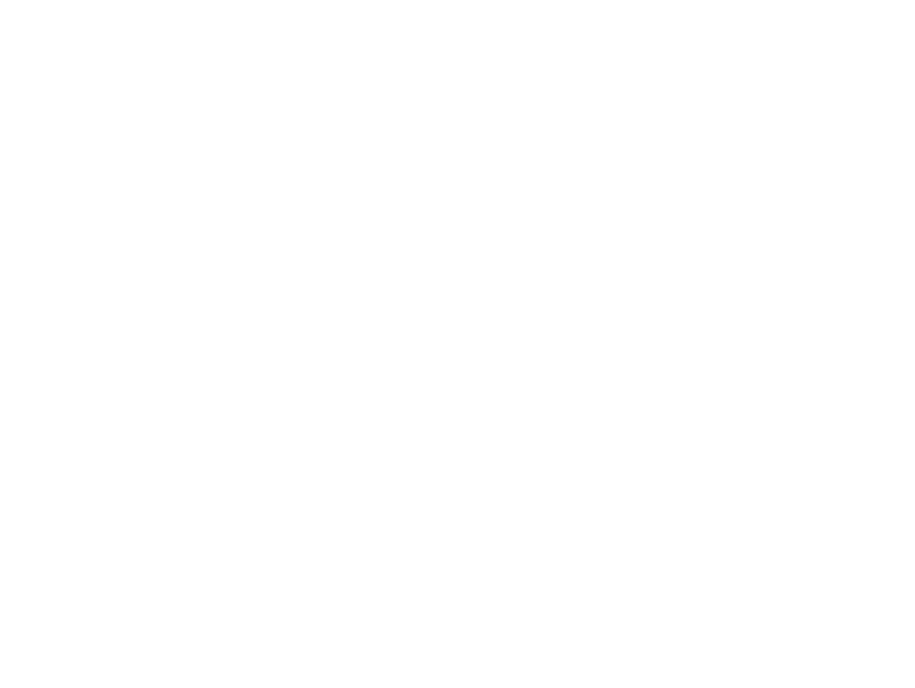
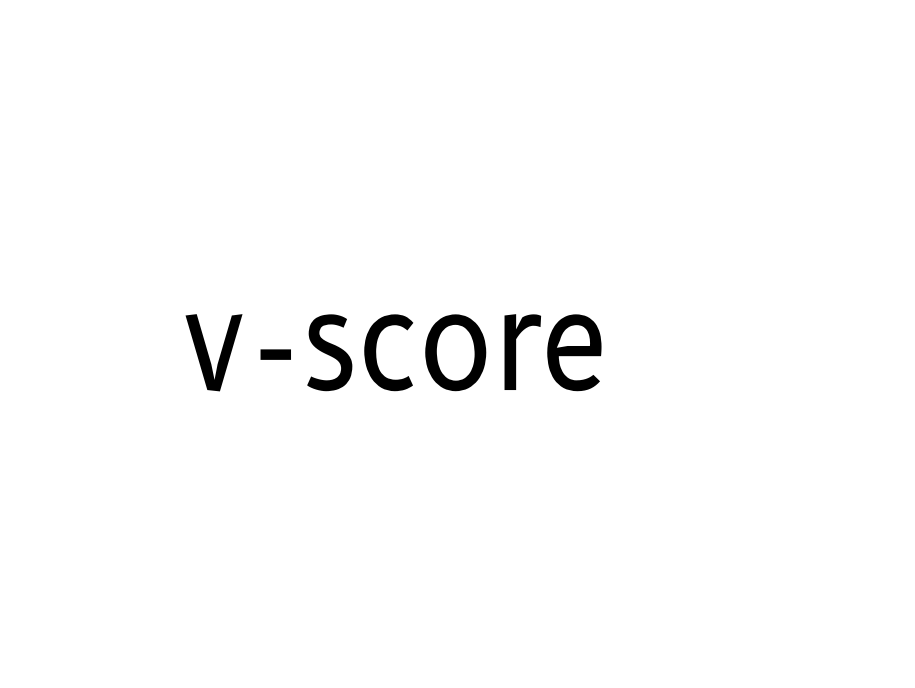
text: none -> v-score (393, 352)

